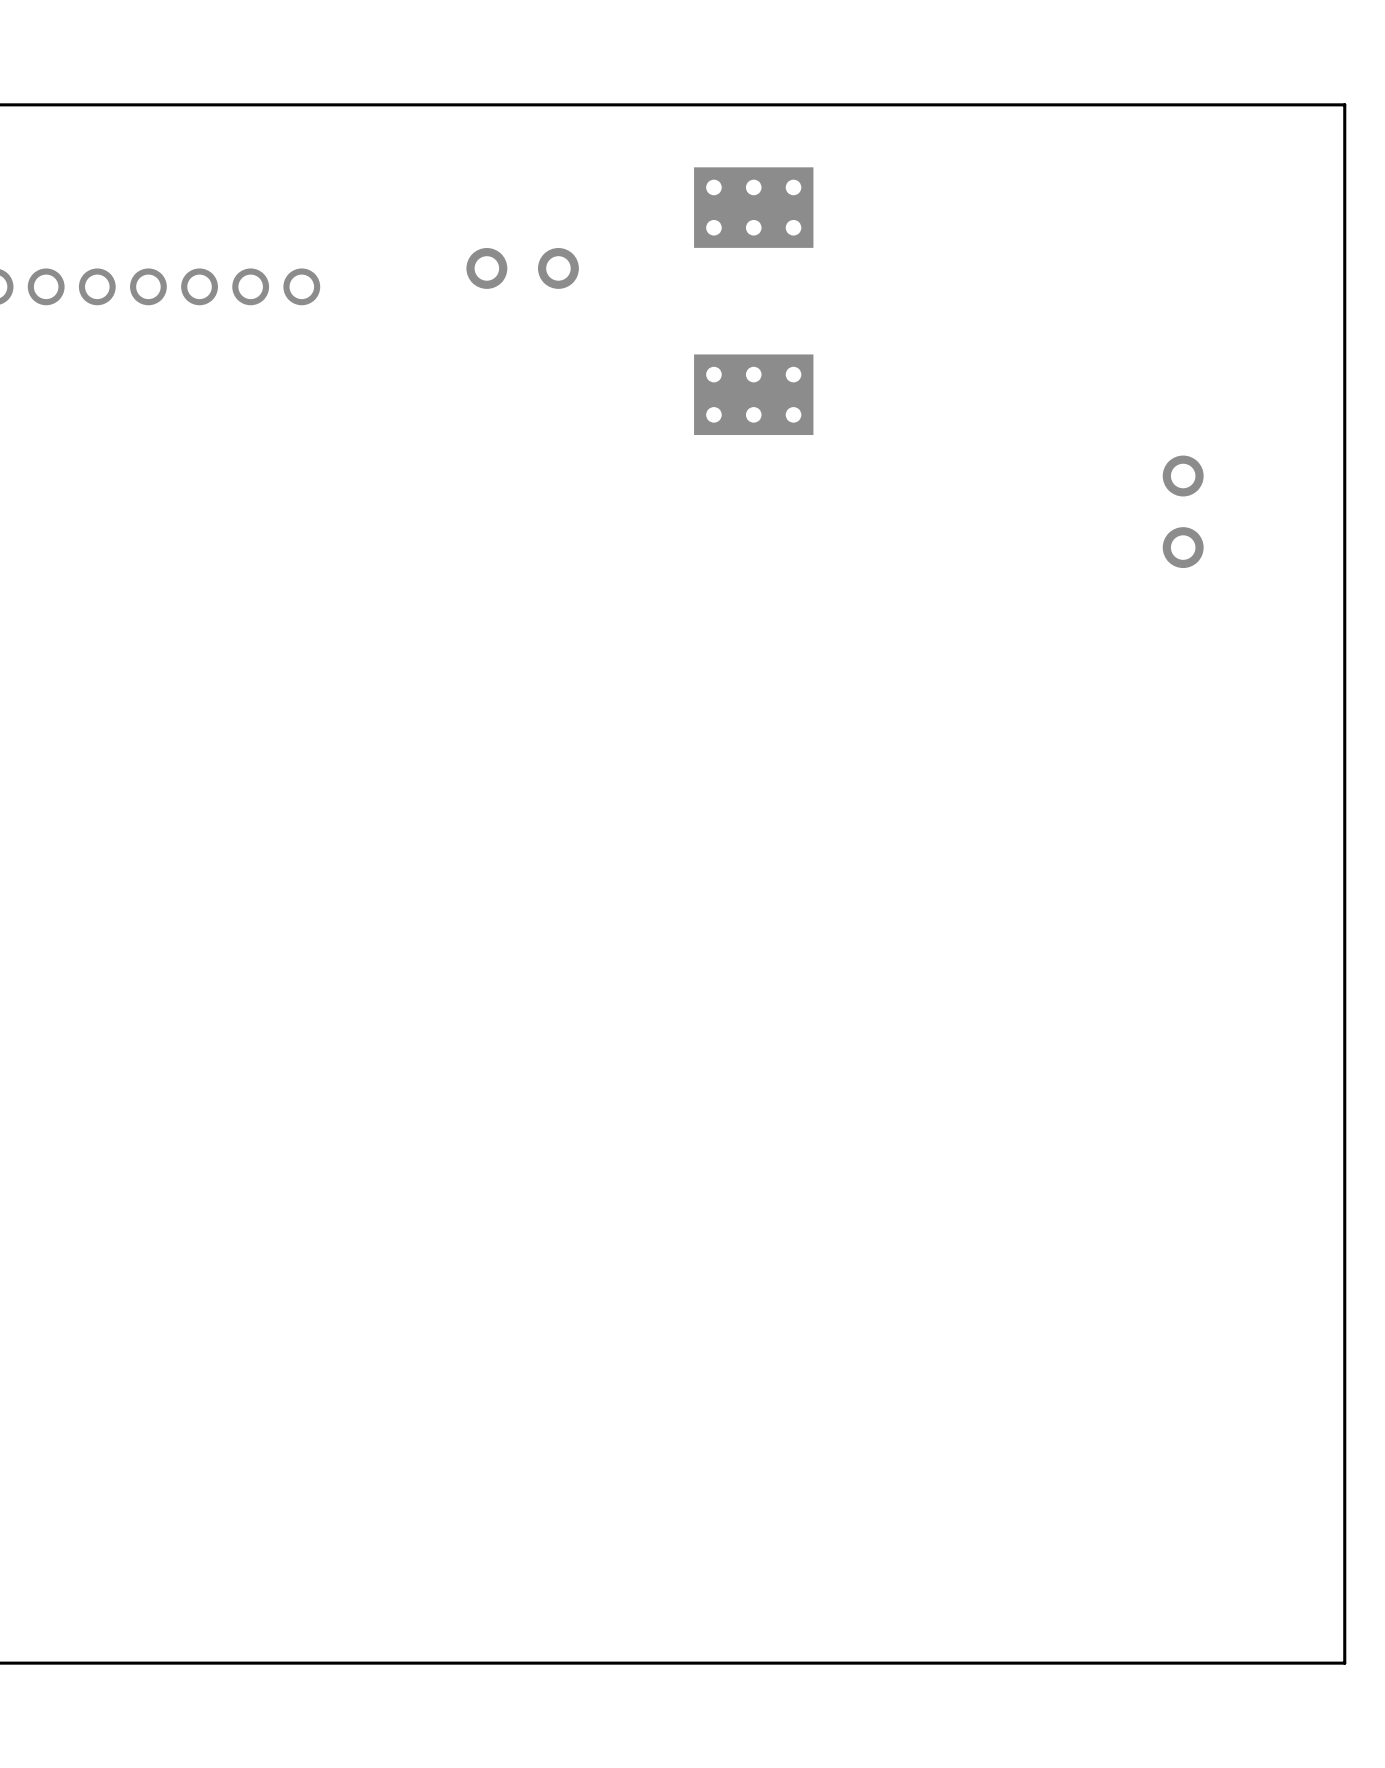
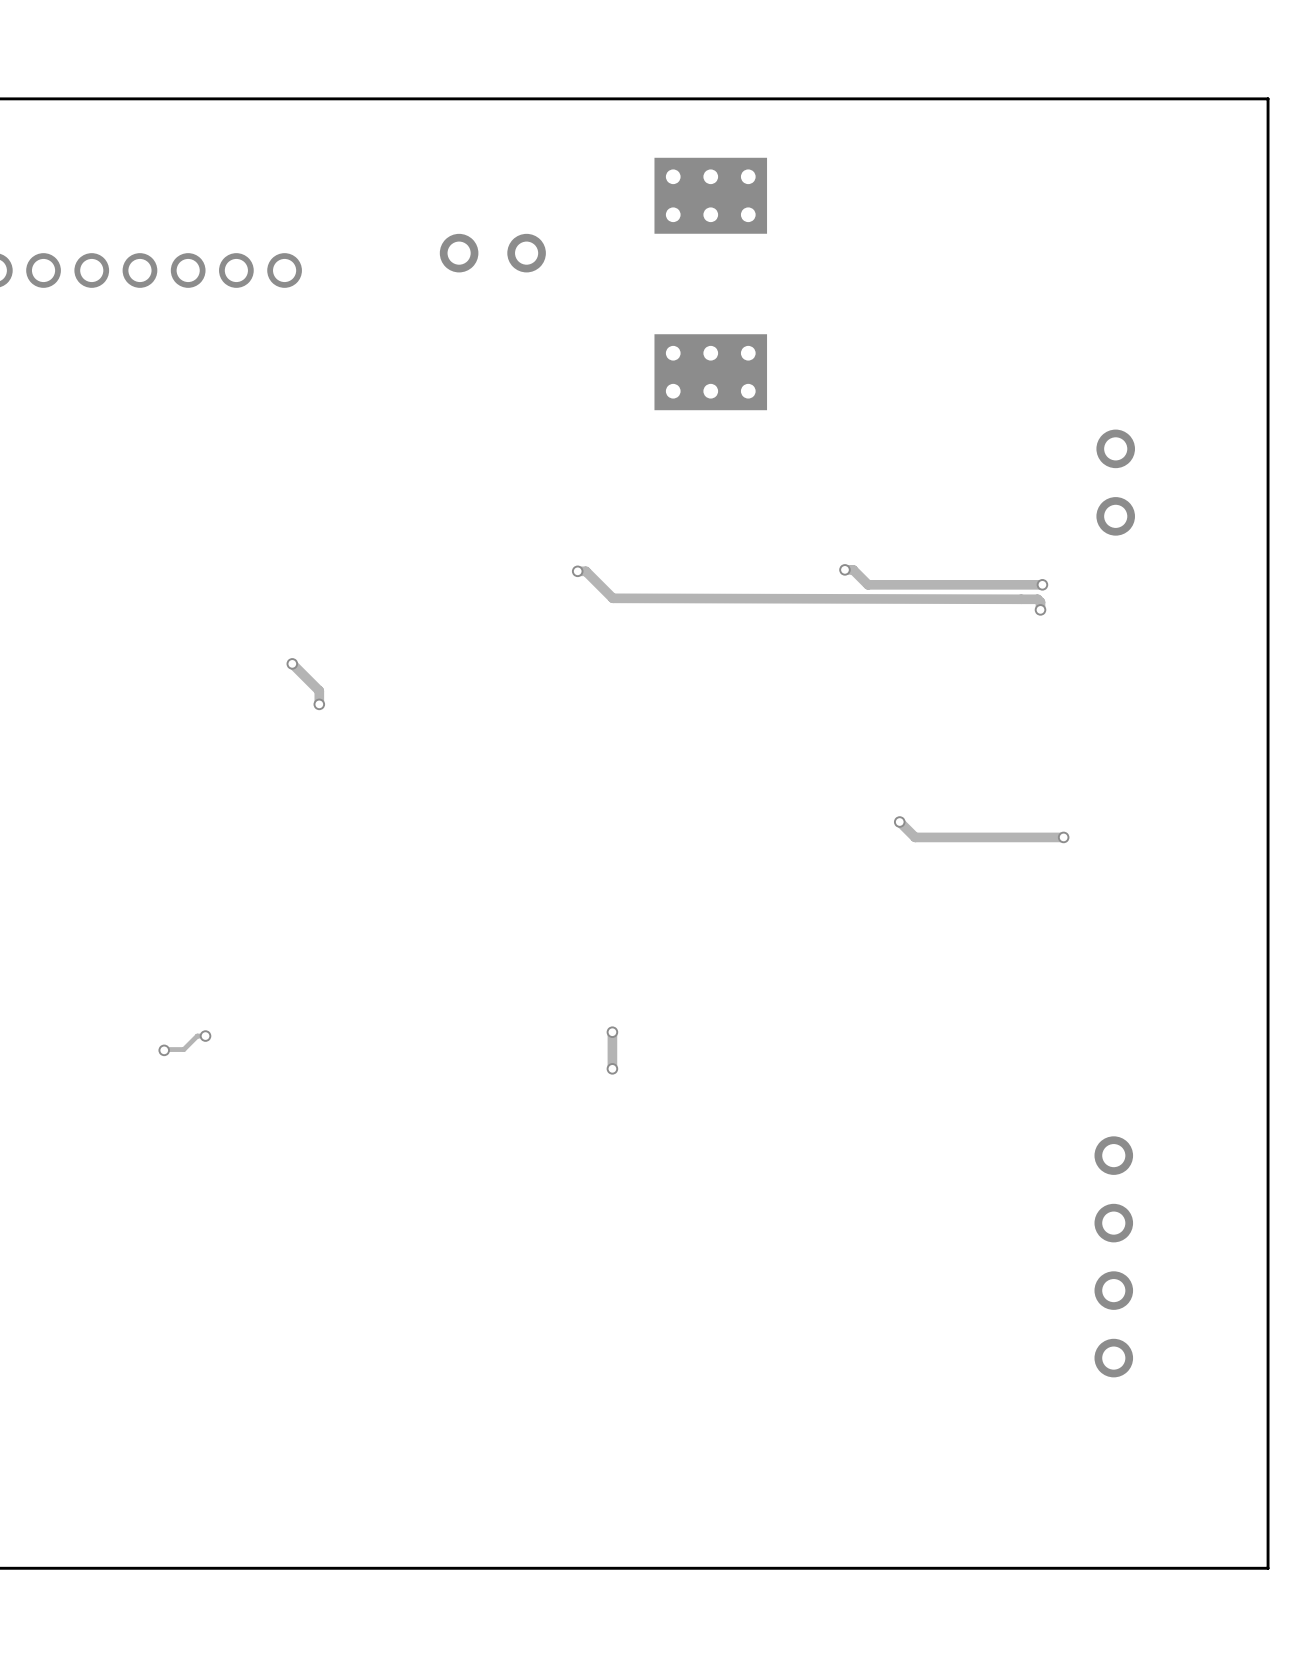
track: none -> (844, 569) (853, 569) (868, 584) (1042, 584)
via: none -> (844, 569)
track: none -> (577, 571) (585, 571) (612, 598) (1037, 599) (1040, 602) (1040, 609)
via: none -> (577, 571)
via: none -> (1042, 584)
via: none -> (1040, 609)
track: none -> (292, 663) (319, 690) (319, 704)
via: none -> (292, 663)
via: none -> (319, 704)
track: none -> (899, 822) (915, 837) (1063, 837)
via: none -> (899, 822)
via: none -> (1063, 837)
track: none -> (612, 1032) (612, 1068)
via: none -> (612, 1032)
track: none -> (205, 1036) (197, 1036) (183, 1049) (164, 1050)
via: none -> (205, 1036)
via: none -> (164, 1050)
via: none -> (612, 1068)
part: none -> (1113, 1256)

